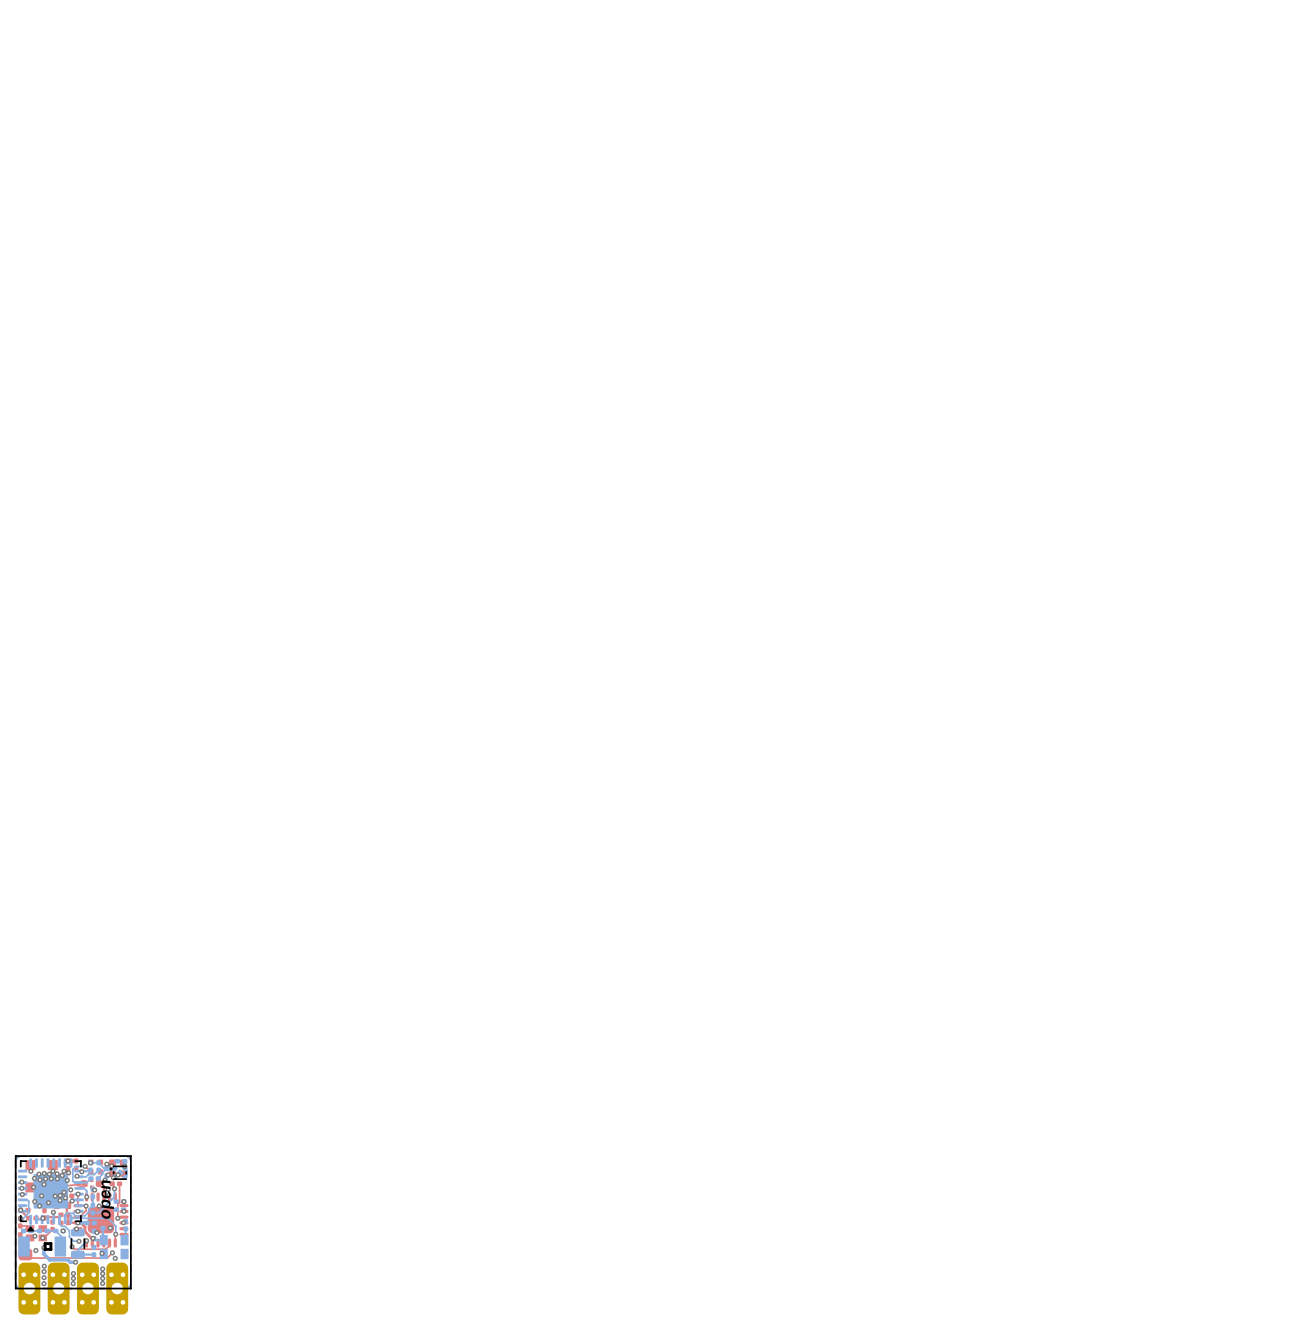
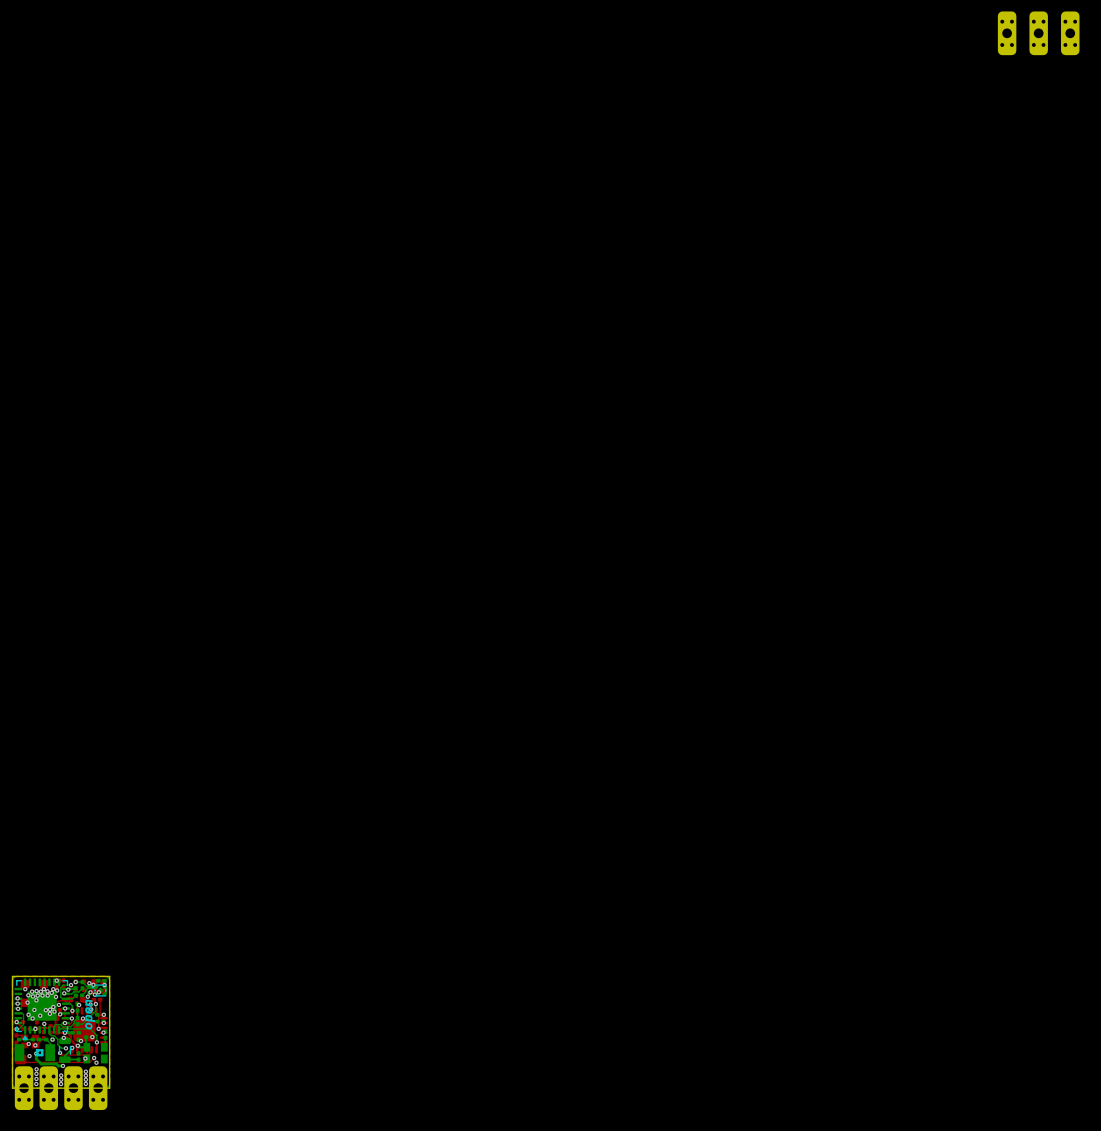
part: none -> (1007, 33)
part: none -> (1038, 33)
part: none -> (1070, 33)

